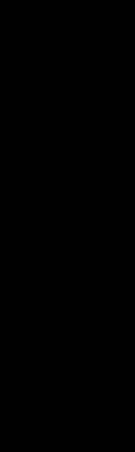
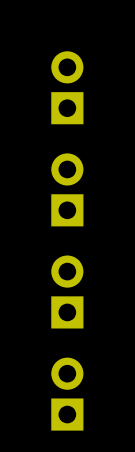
part: none -> (67, 87)
part: none -> (67, 189)
part: none -> (67, 292)
part: none -> (67, 394)

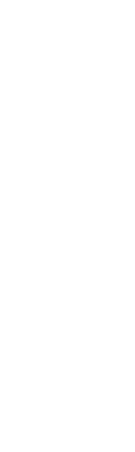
part: (67, 87) -> none
part: (67, 189) -> none
part: (67, 292) -> none
part: (67, 394) -> none

